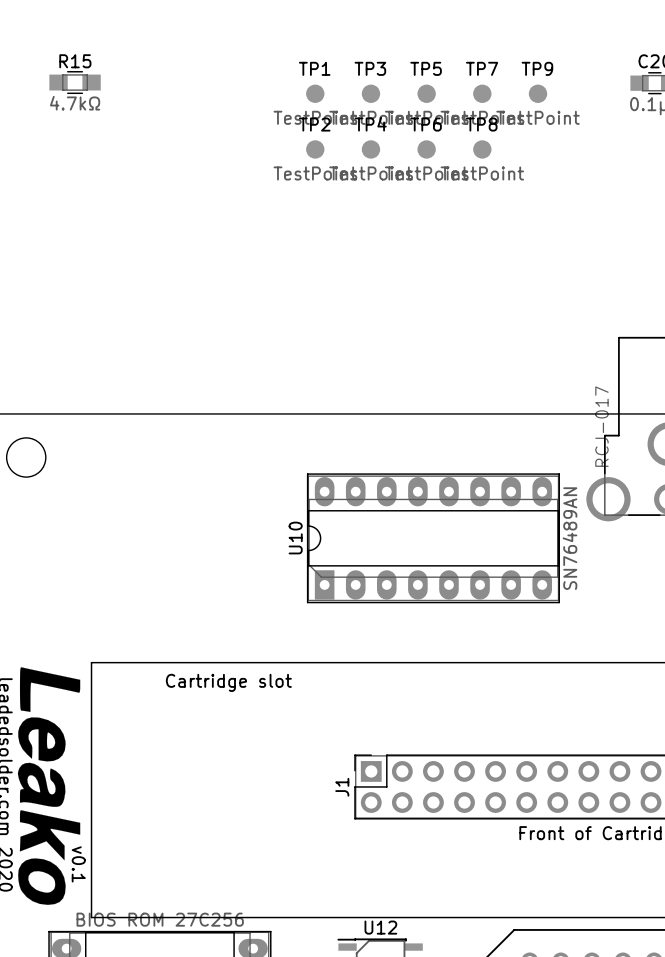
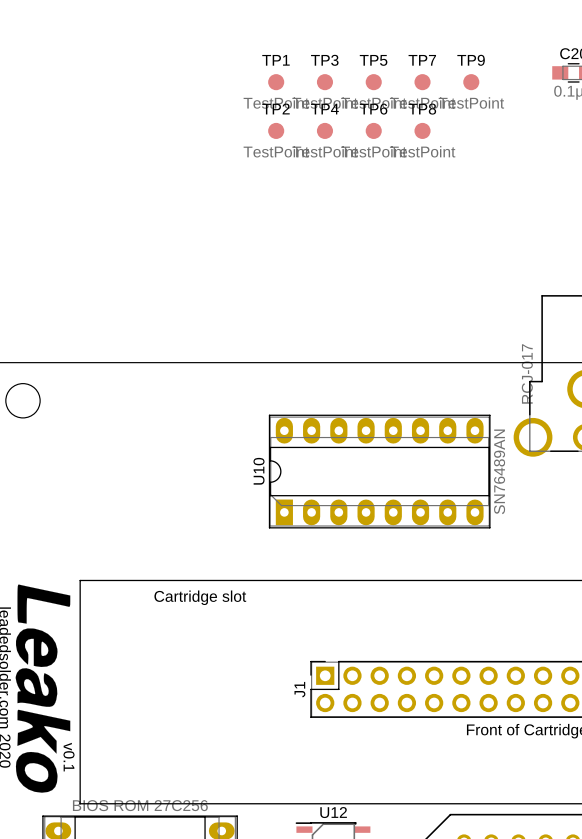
R15: 4.7kΩ (75, 82) -> none

